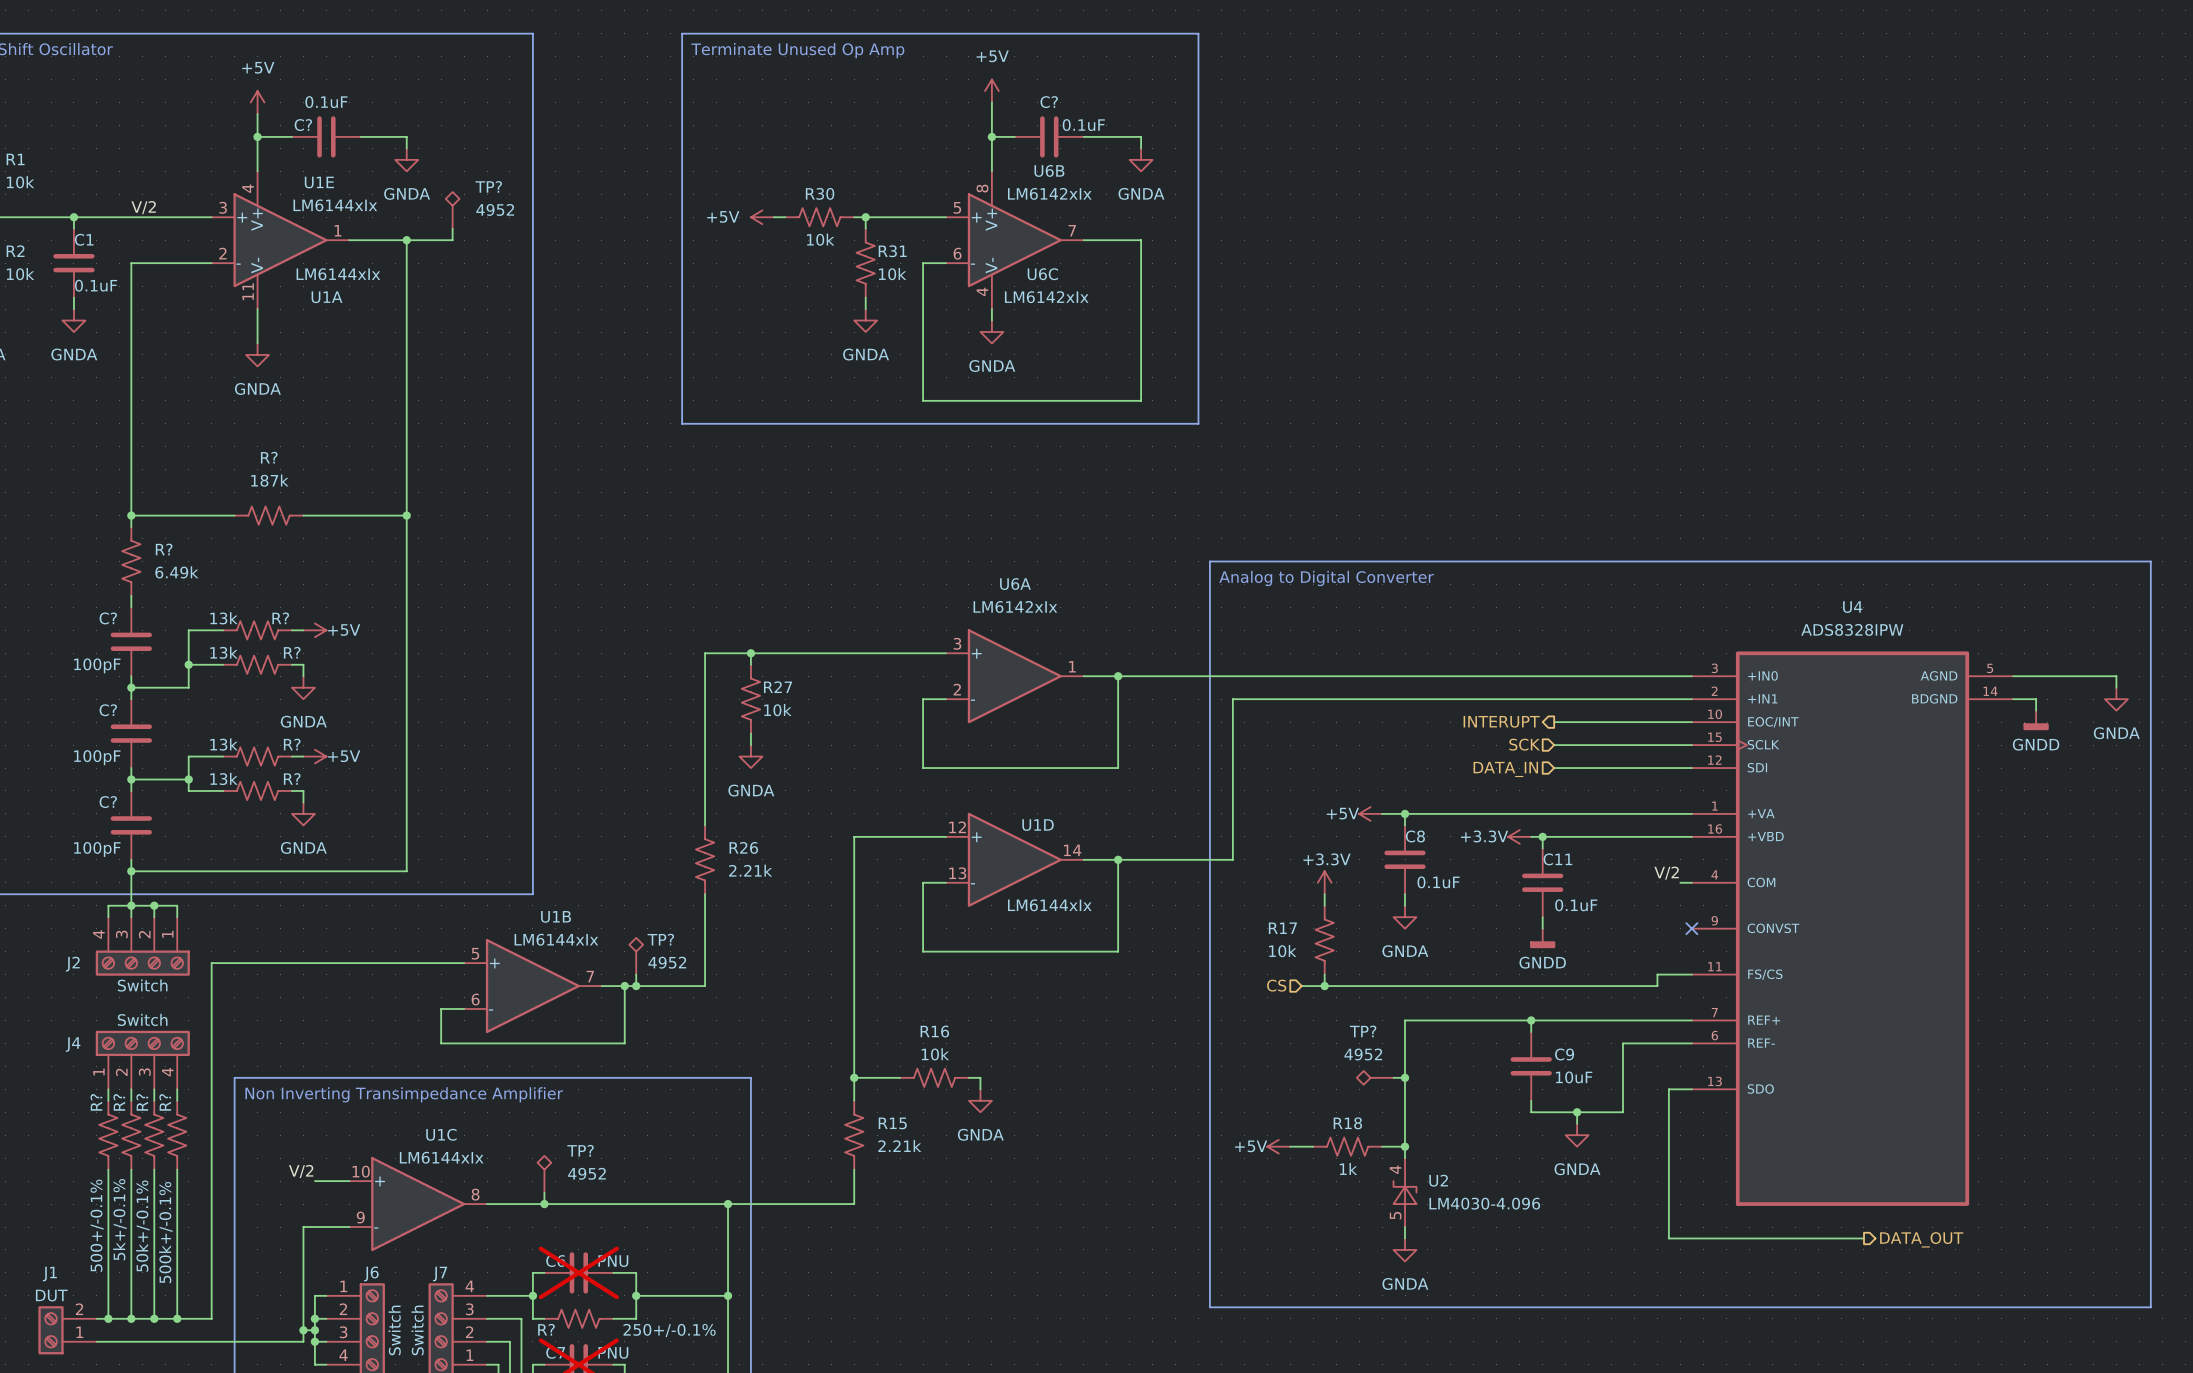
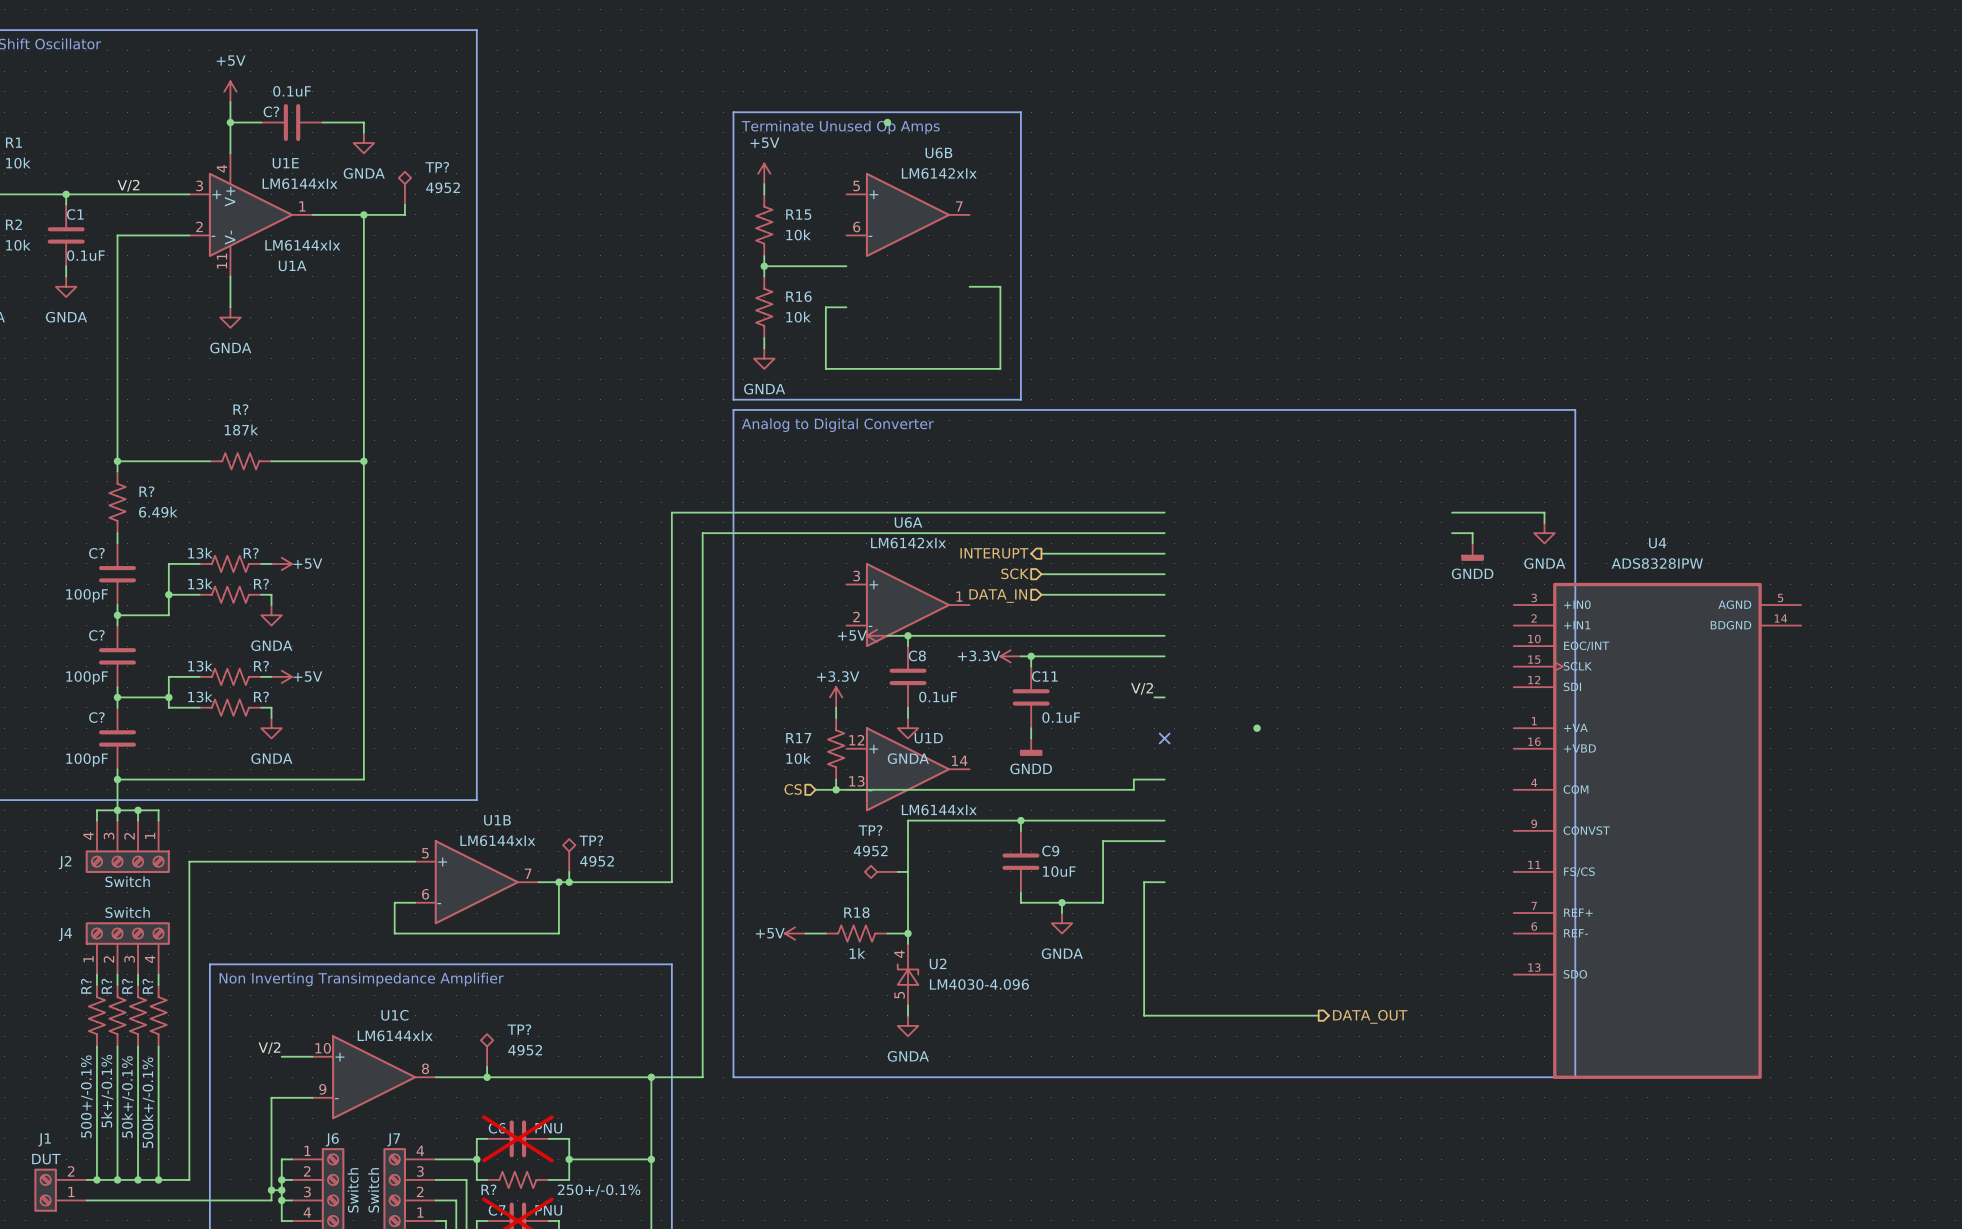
line: (682, 33) (1198, 33) (1198, 423) (682, 423) (682, 33) -> none
text: Terminate Unused Op Amp (797, 50) -> none
power symbol: +5V (991, 91) -> none
wire: (991, 102) (991, 171) -> none
line: none -> (733, 112) (733, 399) (1020, 399) (1020, 112) (733, 112)
wire: (991, 136) (1014, 136) -> none
C?: 0.1uF (1049, 136) -> none
wire: (1083, 136) (1141, 136) (1141, 148) -> none
text: none -> Terminate Unused Op Amps (840, 127)
power symbol: GNDA (1141, 159) -> none
power symbol: none -> +5V (764, 173)
power symbol: +5V (762, 217) -> none
wire: (773, 217) (785, 217) -> none
R30: 10k (819, 217) -> none
wire: (854, 217) (946, 217) -> (764, 194) (764, 184)
wire: (865, 217) (865, 228) -> none
junction: (865, 217) -> none
U6C: LM6142xIx (991, 240) -> none
wire: (1083, 240) (1141, 240) (1141, 400) (923, 400) -> (969, 286) (1000, 286) (1000, 368) (825, 368) (825, 358)
R31: 10k (865, 263) -> none
wire: (946, 263) (923, 263) (923, 343) -> (846, 307) (825, 307)
wire: none -> (764, 255) (764, 276)
wire: none -> (764, 266) (846, 266)
junction: none -> (764, 266)
wire: (865, 297) (865, 309) -> (764, 338) (764, 348)
wire: (991, 309) (991, 320) -> none
power symbol: GNDA (865, 320) -> none
power symbol: GNDA (991, 332) -> none
power symbol: none -> GNDA (764, 358)
line: none -> (733, 409) (1575, 409) (1575, 1077) (733, 1077) (733, 409)
text: none -> Analog to Digital Converter (837, 425)
line: (1209, 561) (2150, 561) (2150, 1307) (1209, 1307) (1209, 561) -> none
wire: none -> (1164, 512) (671, 512) (671, 584)
wire: none -> (1452, 512) (1544, 512) (1544, 522)
text: Analog to Digital Converter (1326, 578) -> none
wire: none -> (1452, 533) (1472, 533) (1472, 543)
power symbol: none -> GNDA (1544, 533)
power symbol: none -> GNDD (1472, 552)
hierarchical label: none -> INTERUPT (994, 553)
wire: none -> (1041, 553) (1164, 553)
hierarchical label: none -> SCK (1015, 573)
wire: none -> (1041, 574) (1164, 574)
junction: (750, 653) -> none
wire: (946, 653) (705, 653) (705, 825) -> none
wire: none -> (1041, 594) (1164, 594)
hierarchical label: none -> DATA_IN (998, 596)
wire: (1083, 676) (1691, 676) -> none
wire: (1118, 676) (1118, 768) (923, 768) (923, 699) (946, 699) -> none
junction: (1118, 676) -> none
wire: (2013, 676) (2116, 676) (2116, 687) -> none
R27: 10k (750, 699) -> none
wire: (1691, 699) (1232, 699) (1232, 859) (1083, 859) -> none
wire: (2013, 699) (2036, 699) (2036, 710) -> none
power symbol: GNDA (2116, 699) -> none
power symbol: none -> +5V (877, 635)
wire: none -> (887, 635) (1164, 635)
wire: none -> (908, 635) (908, 646)
junction: none -> (908, 635)
power symbol: GNDD (2036, 720) -> none
hierarchical label: INTERUPT (1501, 721) -> none
wire: (1554, 722) (1691, 722) -> none
power symbol: none -> +3.3V (1010, 656)
wire: none -> (1020, 656) (1164, 656)
wire: none -> (1031, 656) (1031, 666)
junction: none -> (1031, 656)
hierarchical label: SCK (1524, 744) -> none
wire: (1554, 745) (1691, 745) -> none
power symbol: GNDA (750, 756) -> none
wire: (1554, 768) (1691, 768) -> none
label: none -> V/2 (1142, 688)
hierarchical label: DATA_IN (1505, 769) -> none
power symbol: none -> +3.3V (836, 697)
wire: none -> (1154, 697) (1164, 697)
wire: none -> (836, 707) (836, 717)
wire: none -> (908, 707) (908, 717)
power symbol: none -> GNDA (908, 728)
wire: none -> (1031, 728) (1031, 738)
power symbol: +5V (1370, 813) -> none
wire: (1382, 813) (1691, 813) -> none
wire: (1405, 813) (1405, 825) -> none
no-connect mark: none -> (1164, 738)
power symbol: none -> GNDD (1031, 747)
wire: (946, 836) (854, 836) (854, 1100) -> none
power symbol: +3.3V (1519, 836) -> none
wire: (1531, 836) (1691, 836) -> none
wire: (1542, 836) (1542, 848) -> none
junction: (1542, 836) -> none
R26: 2.21k (705, 859) -> none
wire: (1118, 859) (1118, 951) (923, 951) (923, 882) -> (815, 789) (825, 789)
junction: (1118, 859) -> none
C8 position: (1405, 859) -> (908, 676)
wire: none -> (836, 779) (836, 789)
wire: none -> (1164, 779) (1133, 779) (1133, 789) (846, 789)
label: V/2 (1666, 873) -> none
hierarchical label: none -> CS (793, 789)
junction: none -> (836, 789)
power symbol: +3.3V (1324, 882) -> none
C11 position: (1542, 882) -> (1031, 697)
wire: (1680, 882) (1691, 882) -> none
wire: (705, 894) (705, 986) -> (671, 666) (671, 882) (630, 882)
wire: (1324, 894) (1324, 905) -> (1020, 820) (1020, 830)
wire: (1405, 894) (1405, 905) -> none
junction: none -> (1020, 820)
wire: none -> (1164, 820) (908, 820) (908, 943)
power symbol: GNDA (1405, 917) -> none
wire: (1542, 917) (1542, 928) -> none
no-connect mark: (1691, 928) -> none
power symbol: GNDD (1542, 938) -> none
wire: none -> (1164, 841) (1103, 841) (1103, 902) (1020, 902) (1020, 892)
R17 position: (1324, 940) -> (836, 748)
TP?: none -> 4952 (881, 871)
wire: none -> (897, 871) (908, 871)
wire: (1324, 974) (1324, 986) -> (1061, 902) (1061, 913)
wire: (1691, 974) (1657, 974) (1657, 986) (1301, 986) -> (1318, 1015) (1144, 1015) (1144, 882) (1164, 882)
hierarchical label: CS (1276, 985) -> none
junction: (1324, 986) -> none
junction: none -> (1061, 902)
wire: (1531, 1020) (1531, 1031) -> none
junction: (1531, 1020) -> none
wire: (1691, 1020) (1405, 1020) (1405, 1158) -> none
power symbol: none -> GNDA (1061, 923)
power symbol: none -> +5V (795, 933)
wire: none -> (805, 933) (825, 933)
wire: none -> (887, 933) (908, 933)
junction: none -> (908, 933)
wire: (1691, 1043) (1623, 1043) (1623, 1112) (1531, 1112) (1531, 1100) -> none
R16 value position: 10k (935, 1054) -> 10k (798, 317)
C9 position: (1531, 1066) -> (1020, 861)
wire: (854, 1077) (900, 1077) -> none
junction: (854, 1077) -> none
R16 rotation: 0° (934, 1077) -> 90° clockwise (764, 307)
R16 position: (934, 1077) -> (764, 307)
wire: (968, 1077) (980, 1077) (980, 1089) -> none
TP?: 4952 (1375, 1077) -> none
wire: (1393, 1077) (1405, 1077) -> none
junction: (1405, 1077) -> none
wire: (1691, 1089) (1668, 1089) (1668, 1238) (1863, 1238) -> none
power symbol position: GNDA (980, 1100) -> GNDA (908, 1025)
wire: (1577, 1112) (1577, 1123) -> none
junction: (1577, 1112) -> none
wire: none -> (908, 1005) (908, 1015)
R15 position: (854, 1135) -> (764, 225)
power symbol: GNDA (1577, 1135) -> none
hierarchical label: none -> DATA_OUT (1370, 1016)
R15 value: 2.21k (899, 1146) -> 10k (798, 234)
power symbol: +5V (1278, 1146) -> none
wire: (1290, 1146) (1313, 1146) -> none
R18 position: (1347, 1146) -> (856, 933)
wire: (1382, 1146) (1405, 1146) -> none
junction: (1405, 1146) -> none
wire: (854, 1169) (854, 1204) (785, 1204) -> (1164, 533) (702, 533) (702, 1077)
U2 position: (1405, 1192) -> (908, 974)
wire: (1405, 1227) (1405, 1238) -> none
hierarchical label: DATA_OUT (1921, 1239) -> none
power symbol: GNDA (1405, 1249) -> none

